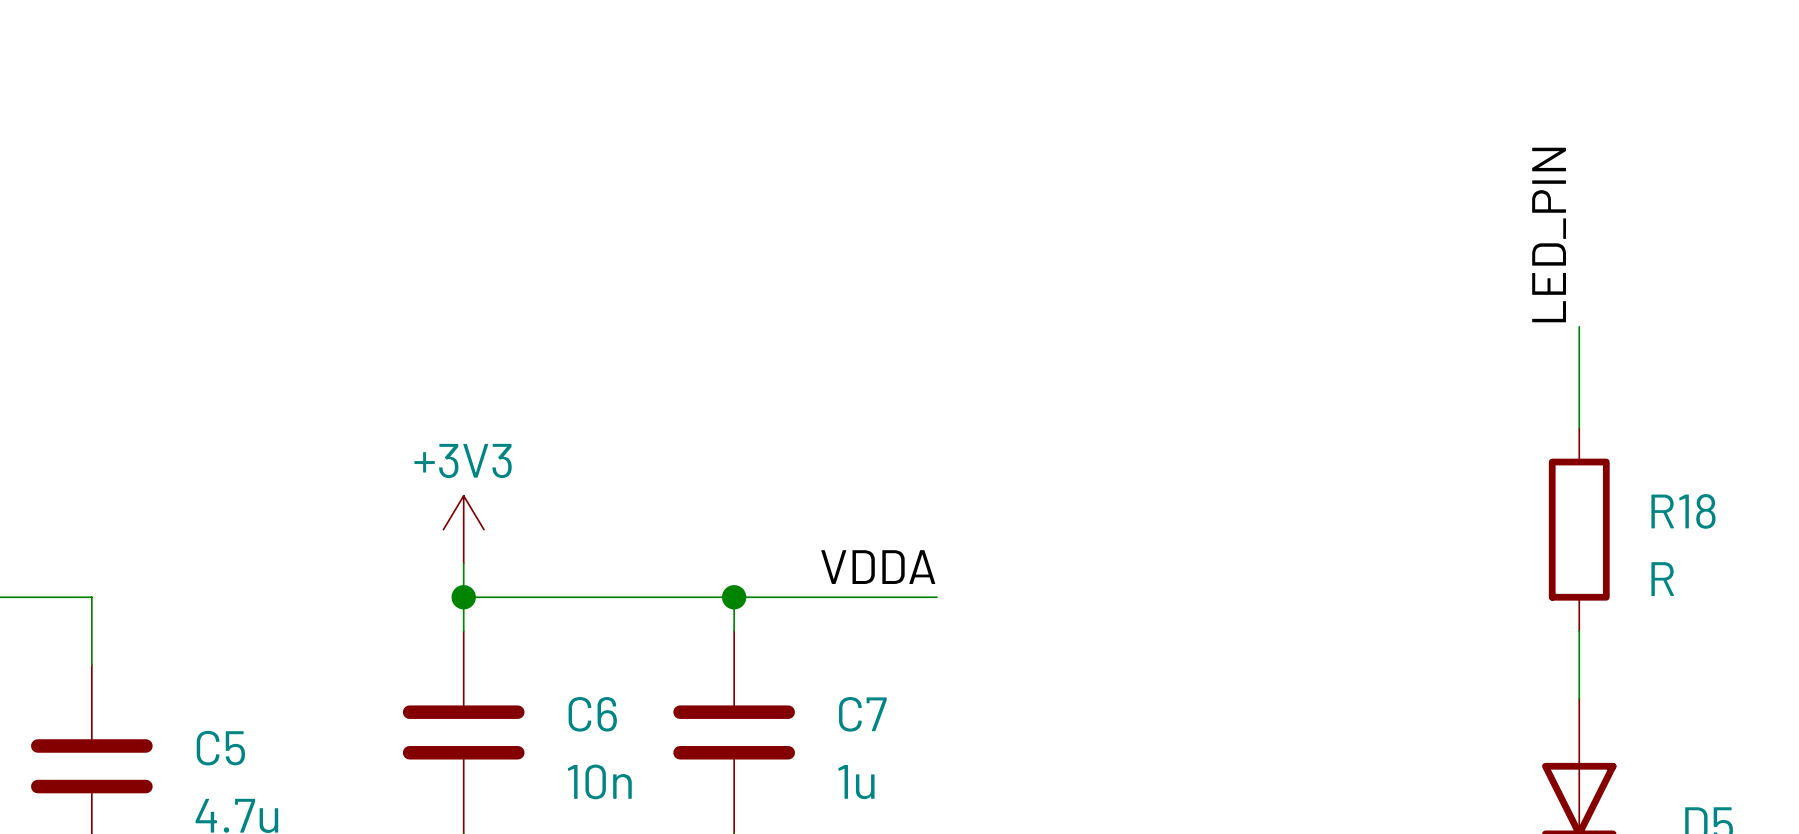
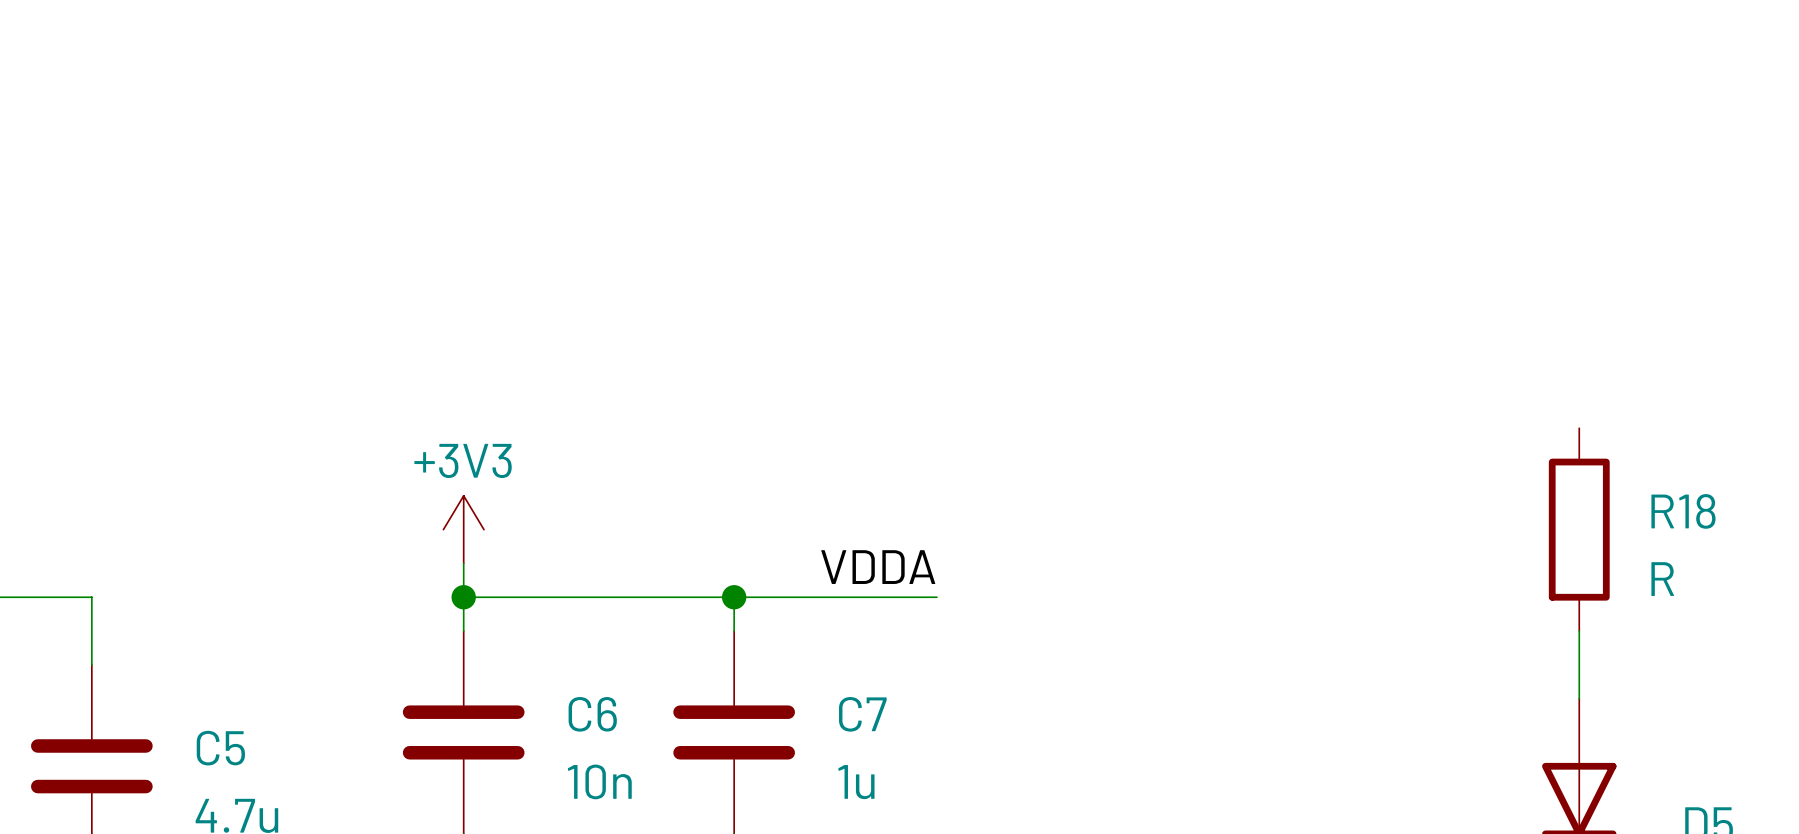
label: LED_PIN (1549, 235) -> none
wire: (1579, 326) (1579, 428) -> none

